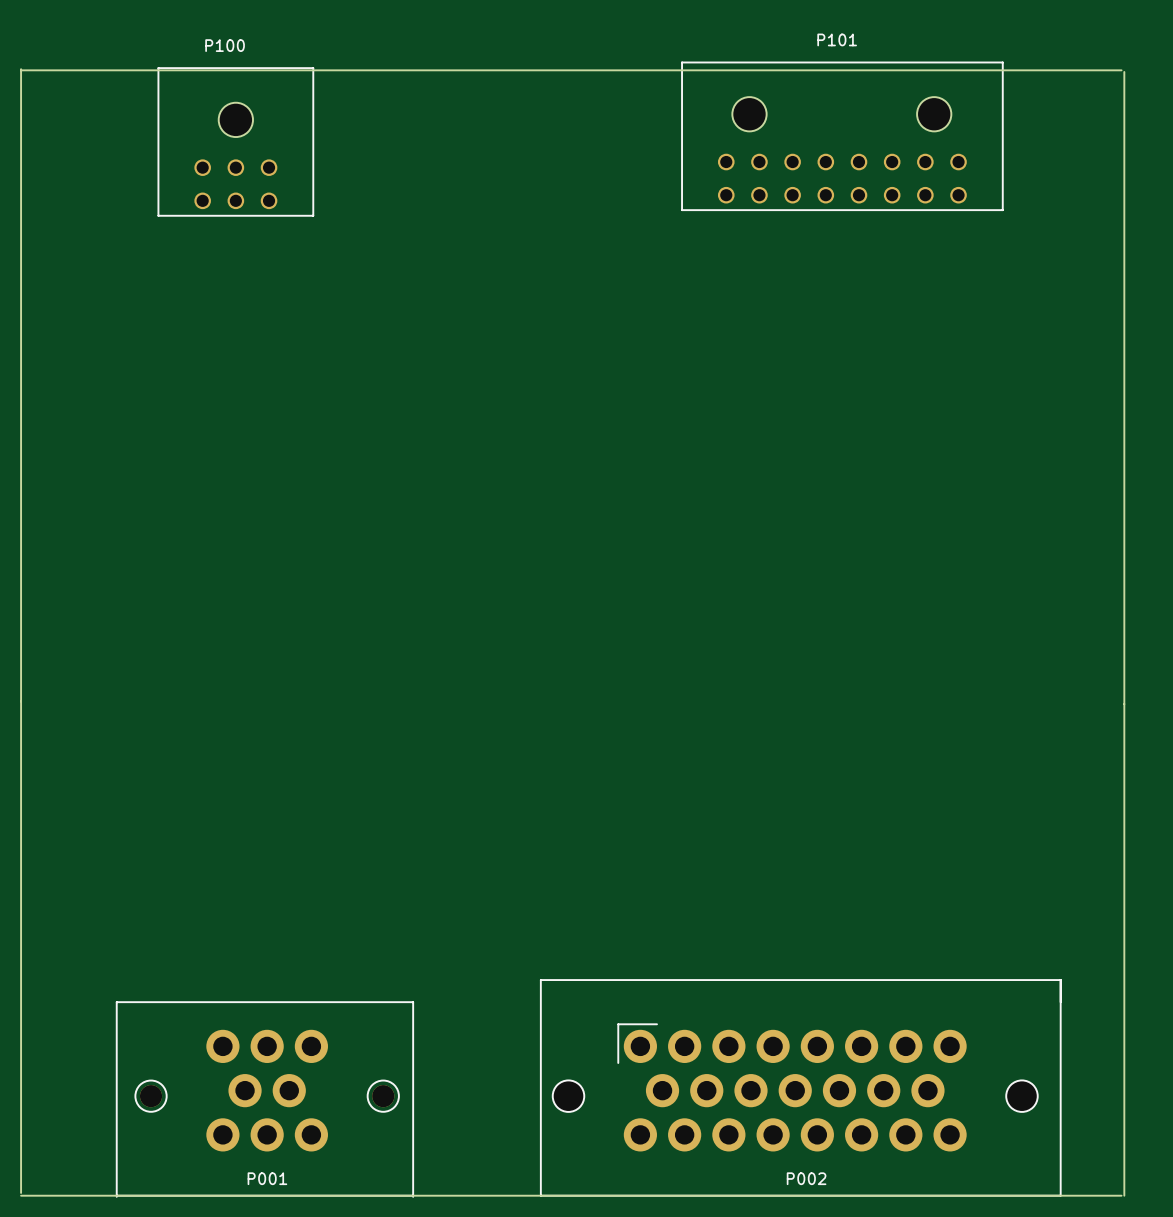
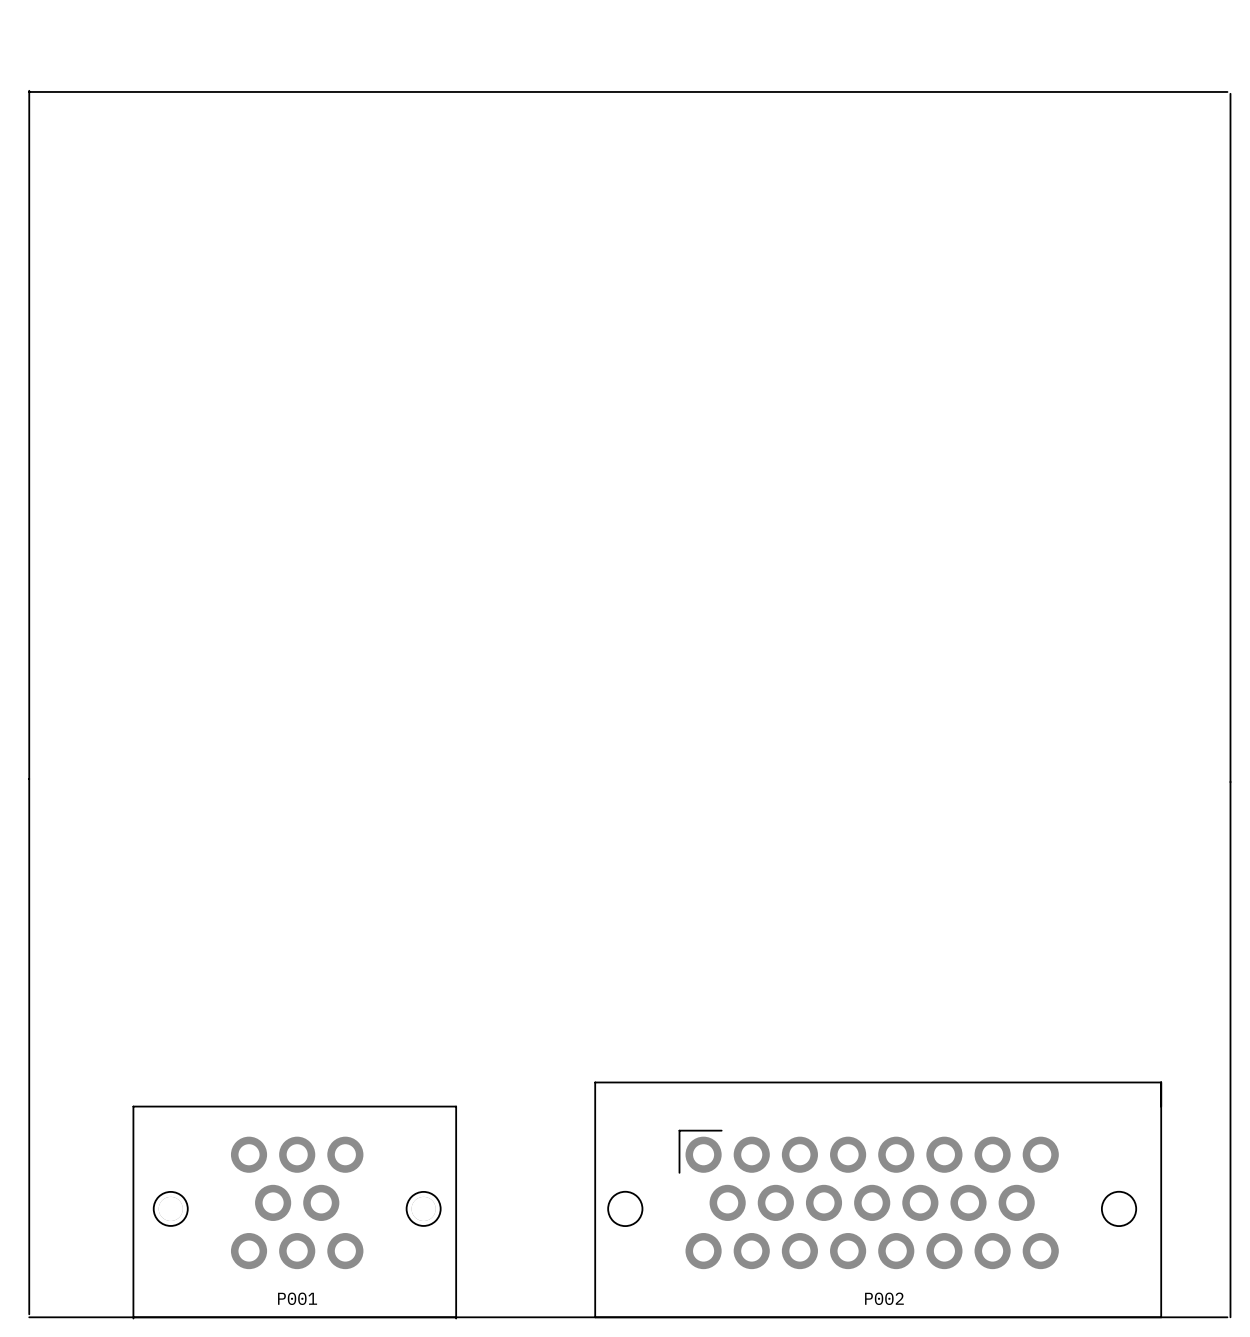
P101: (842, 136) -> none
P100: (235, 141) -> none

